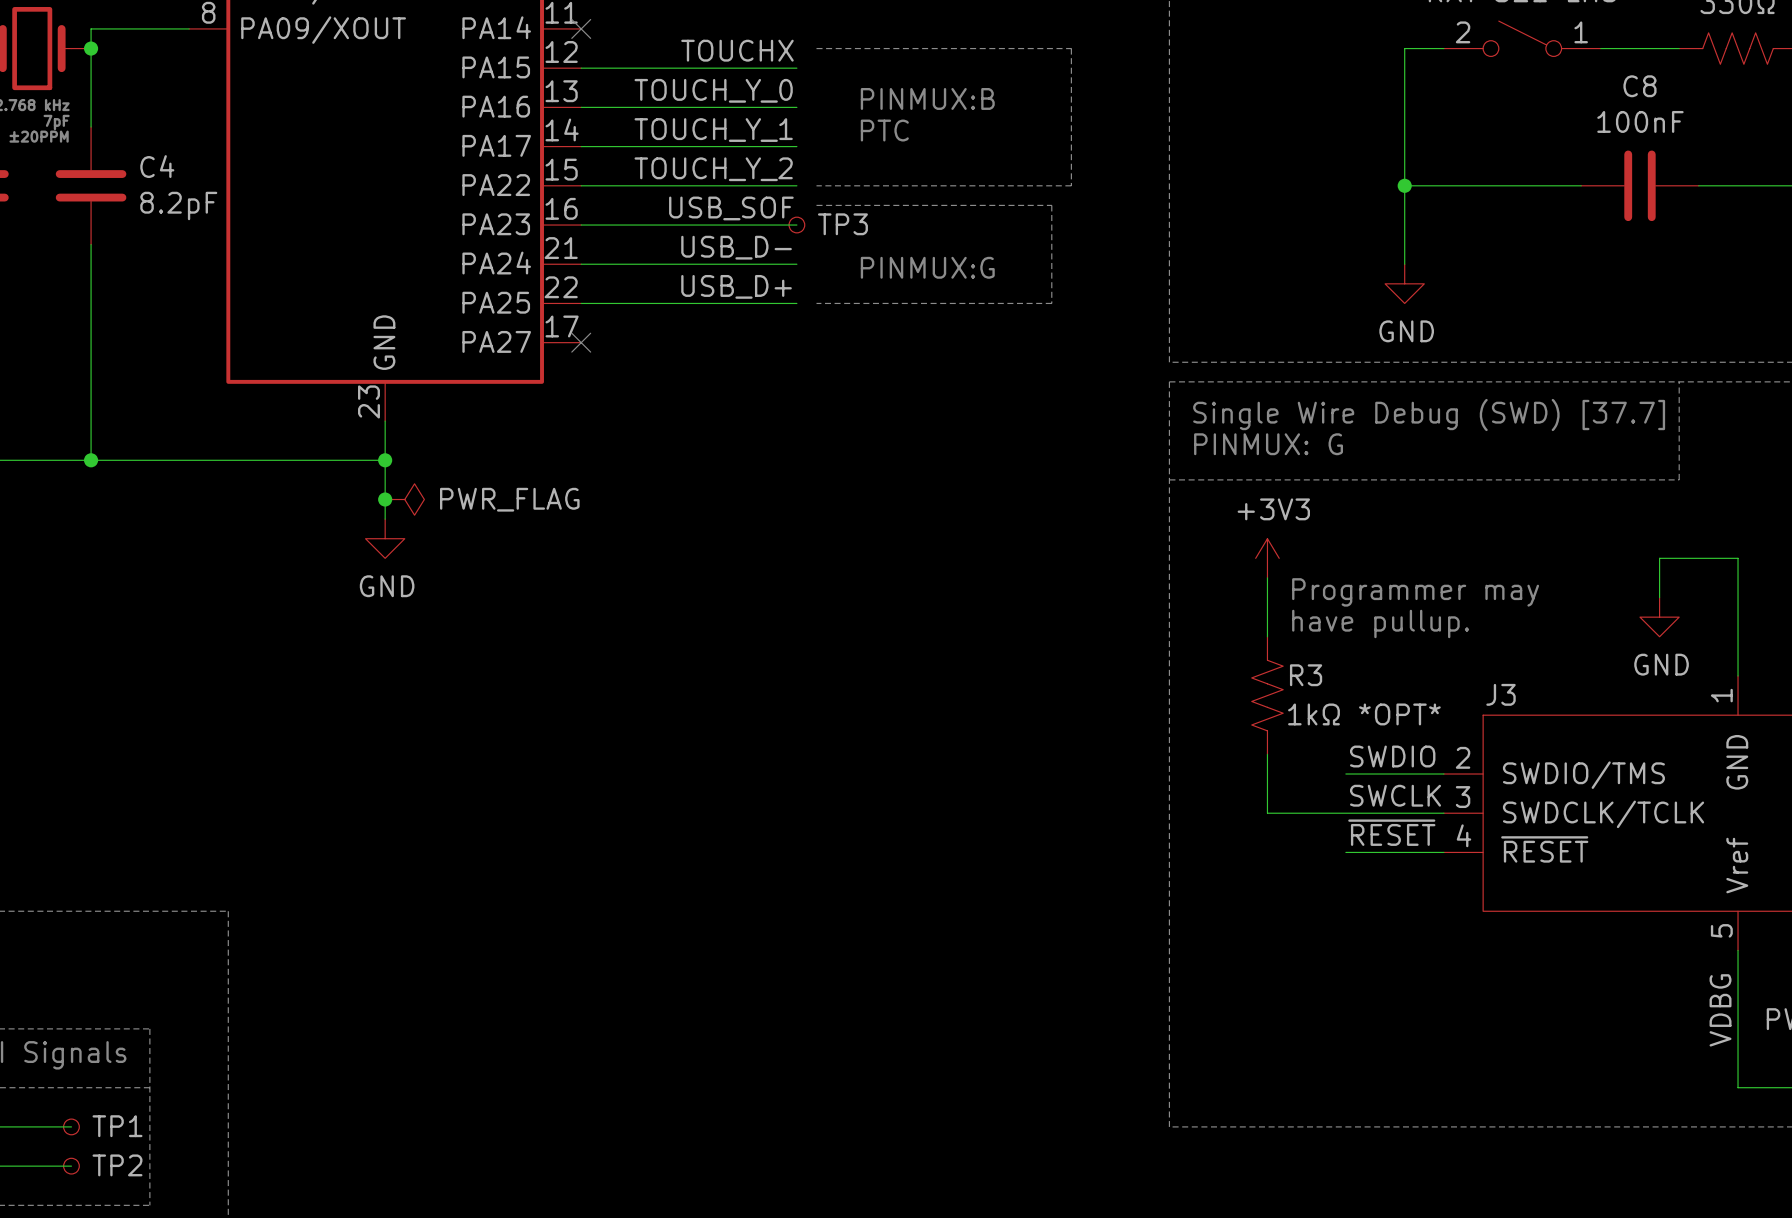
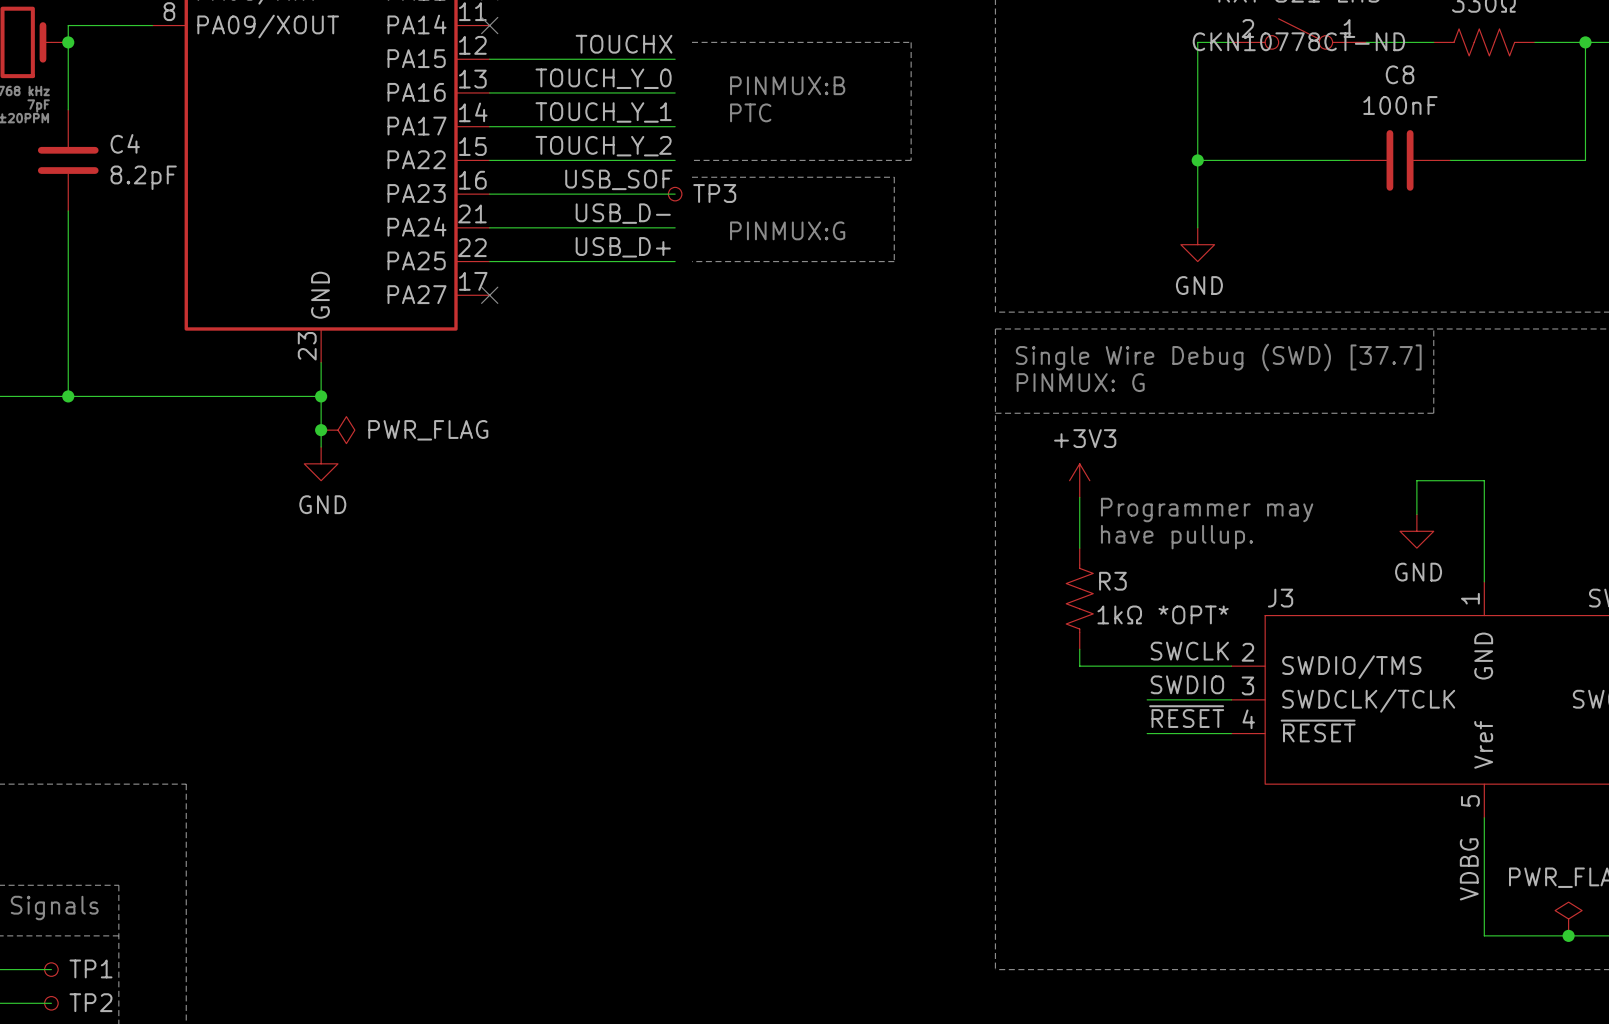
part text: none -> CKN10778CT-ND (1298, 41)
label: SWDIO (1392, 756) -> SWCLK (1189, 651)
wire: (1267, 774) (1267, 813) (1345, 813) -> (1079, 666) (1147, 666)
label: SWCLK (1395, 795) -> SWDIO (1187, 684)

